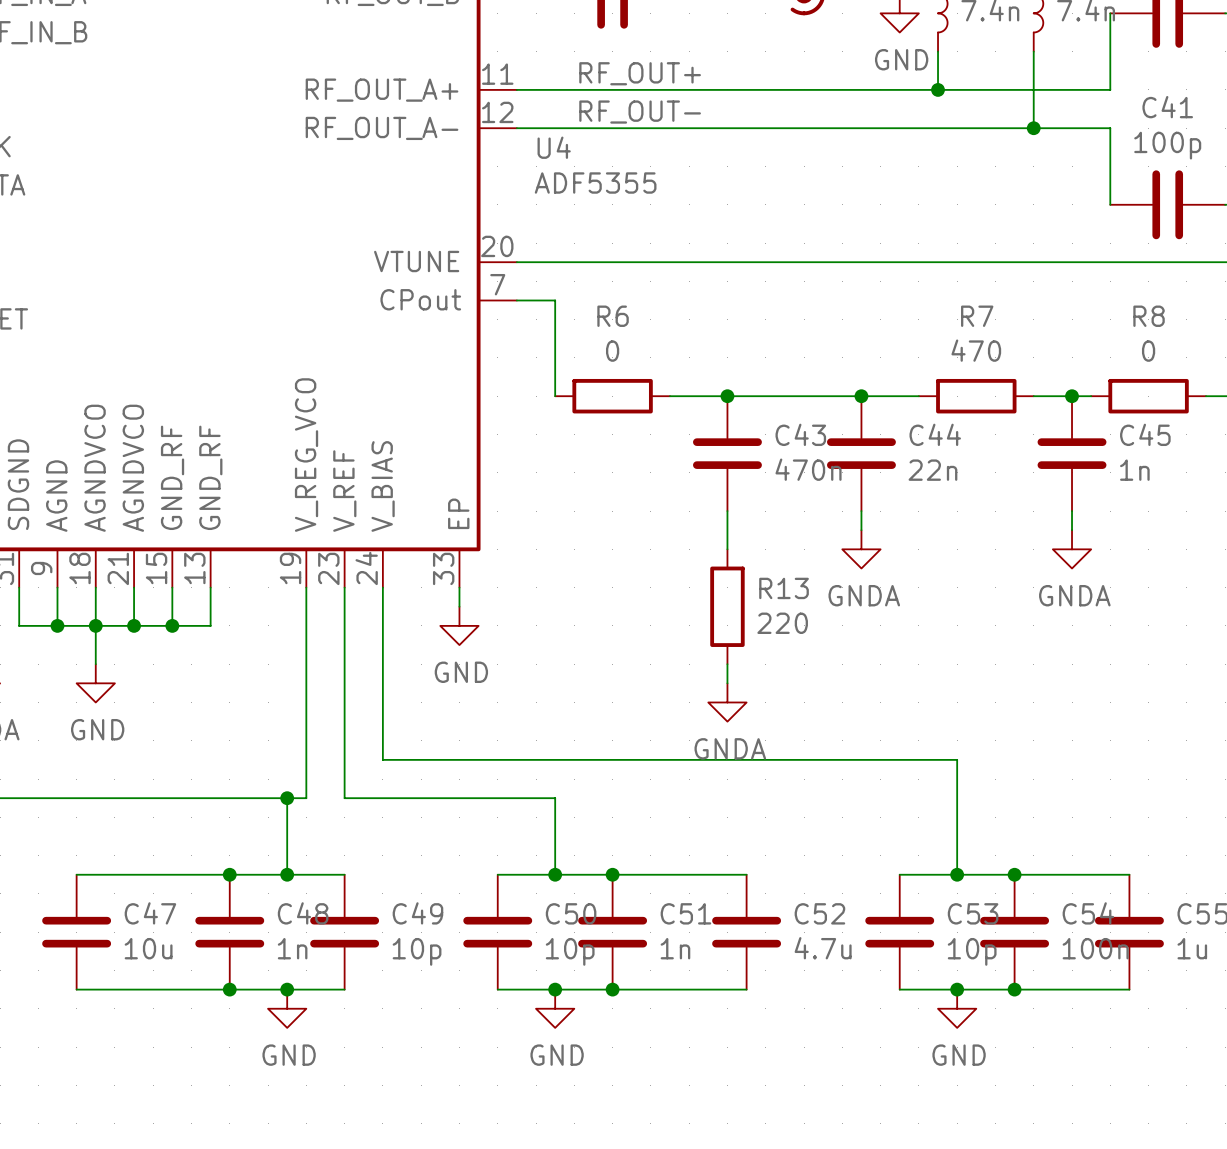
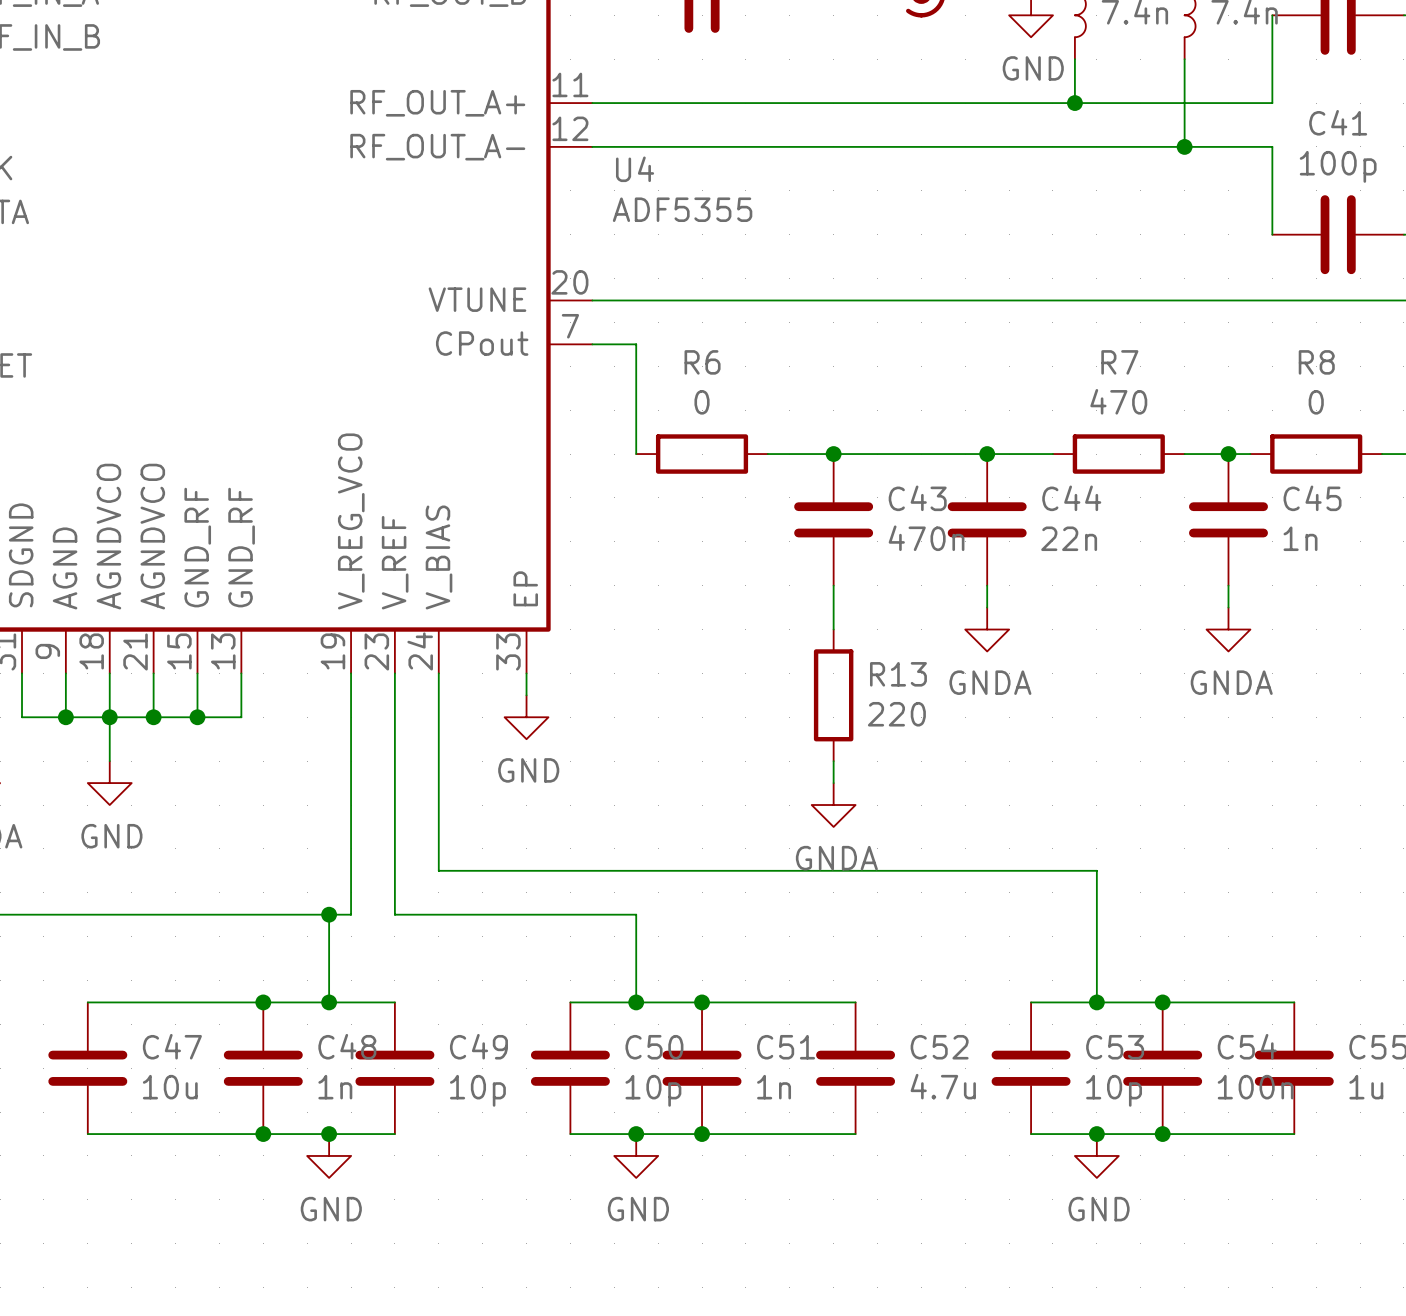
label: RF_OUT+ (640, 73) -> none
label: RF_OUT- (640, 112) -> none

